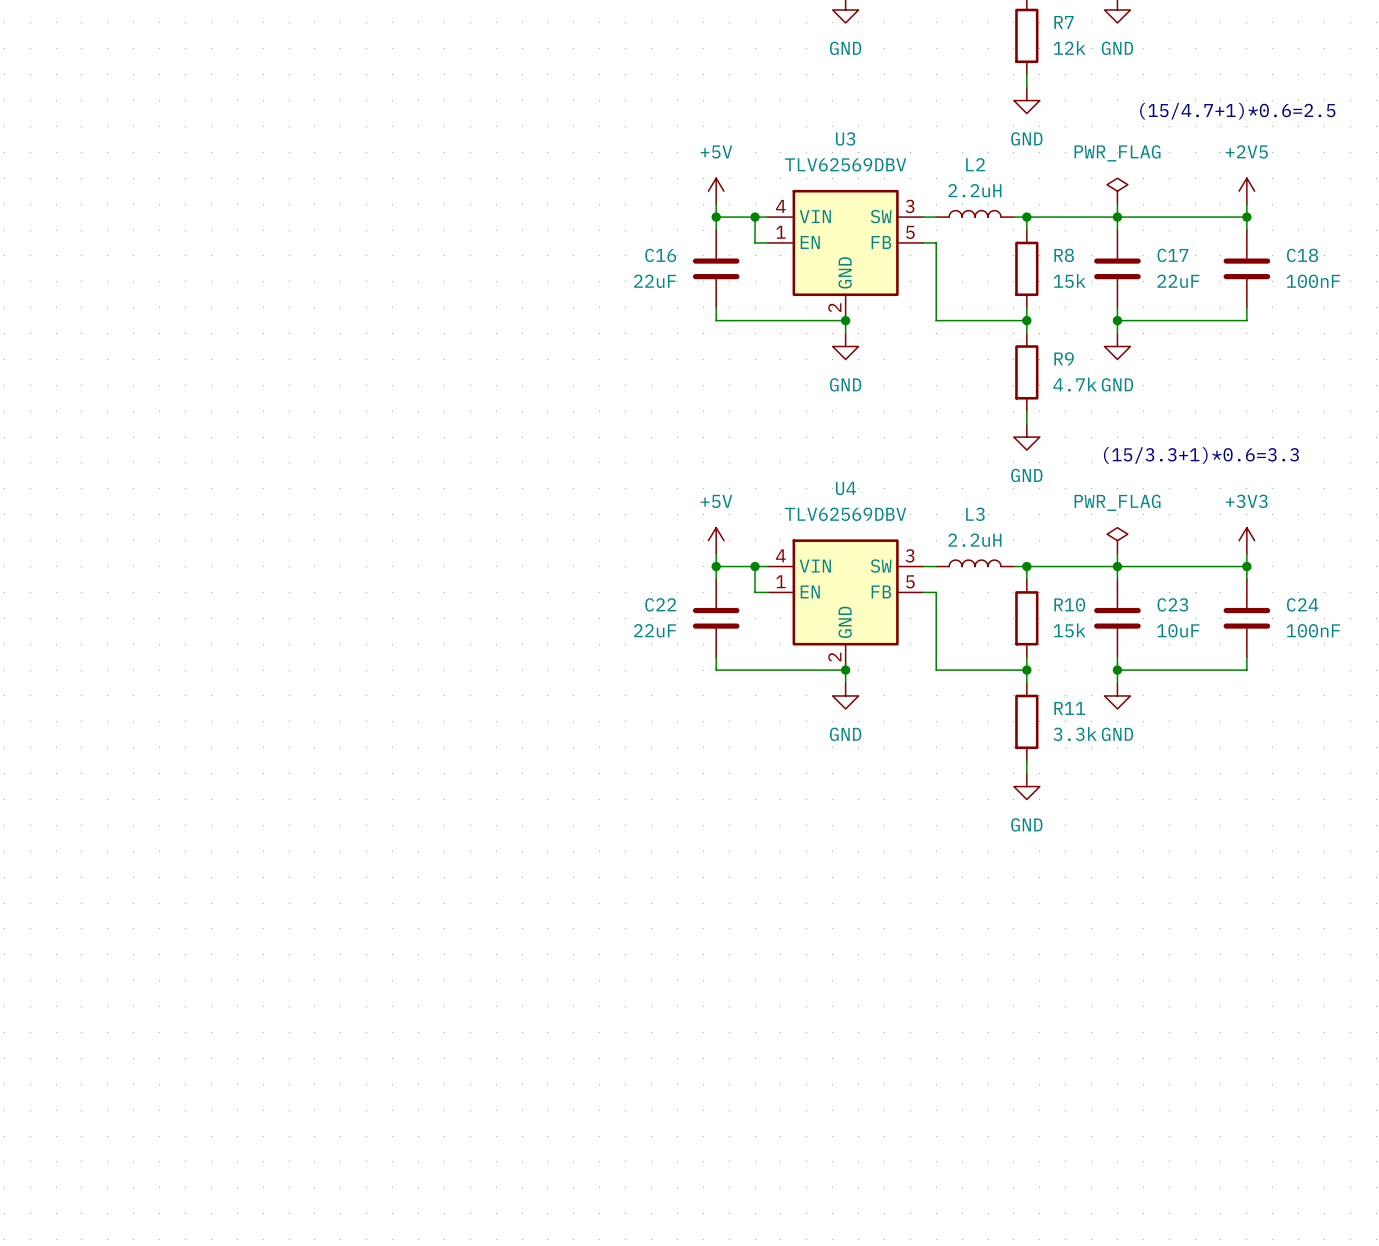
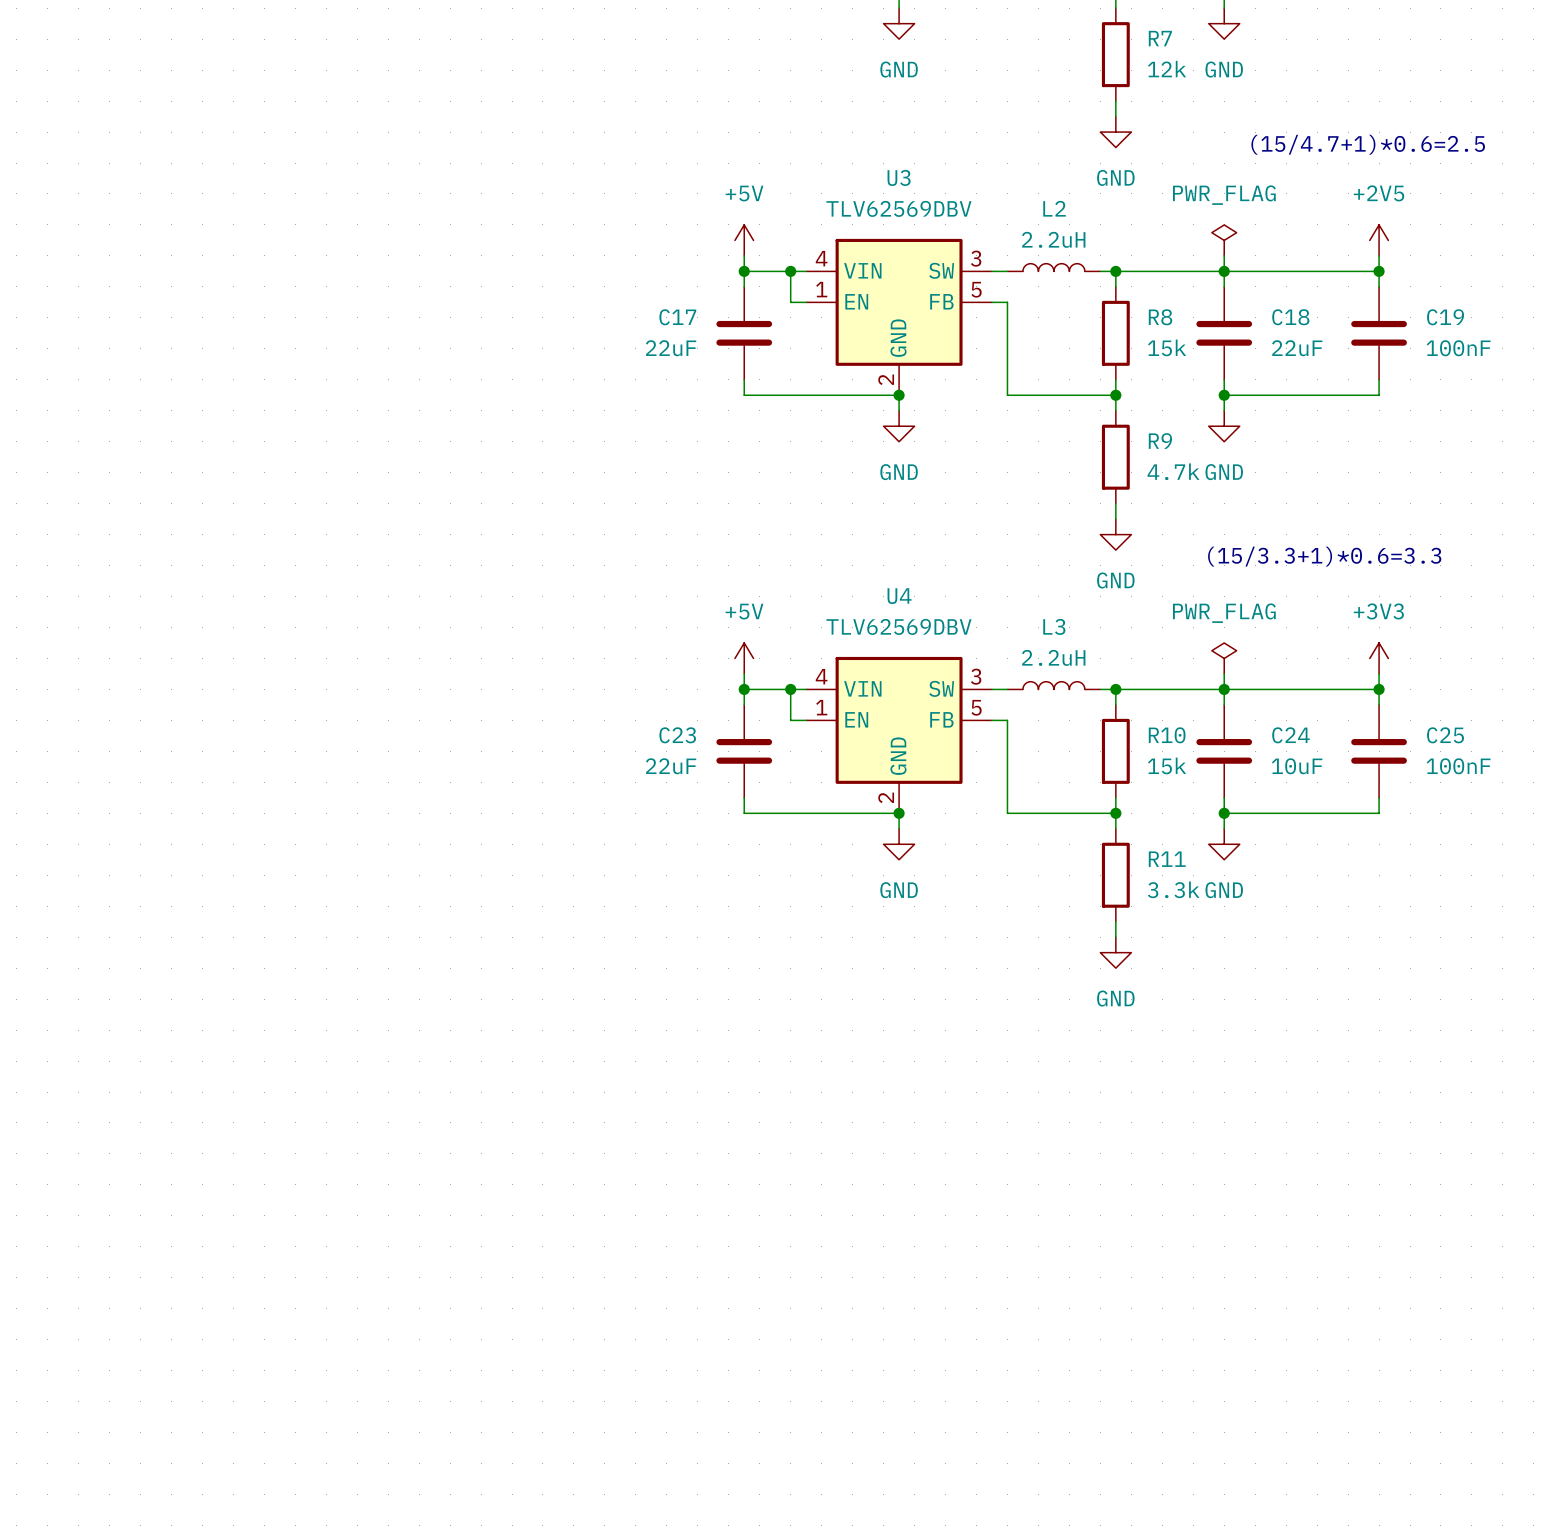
C16 name: C16 (660, 255) -> C17 (677, 317)
C17 name: C17 (1172, 255) -> C18 (1290, 317)
C18 name: C18 (1302, 255) -> C19 (1445, 317)
C22 name: C22 (660, 604) -> C23 (677, 735)
C23 name: C23 (1172, 604) -> C24 (1290, 735)
C24 name: C24 (1302, 604) -> C25 (1445, 735)

